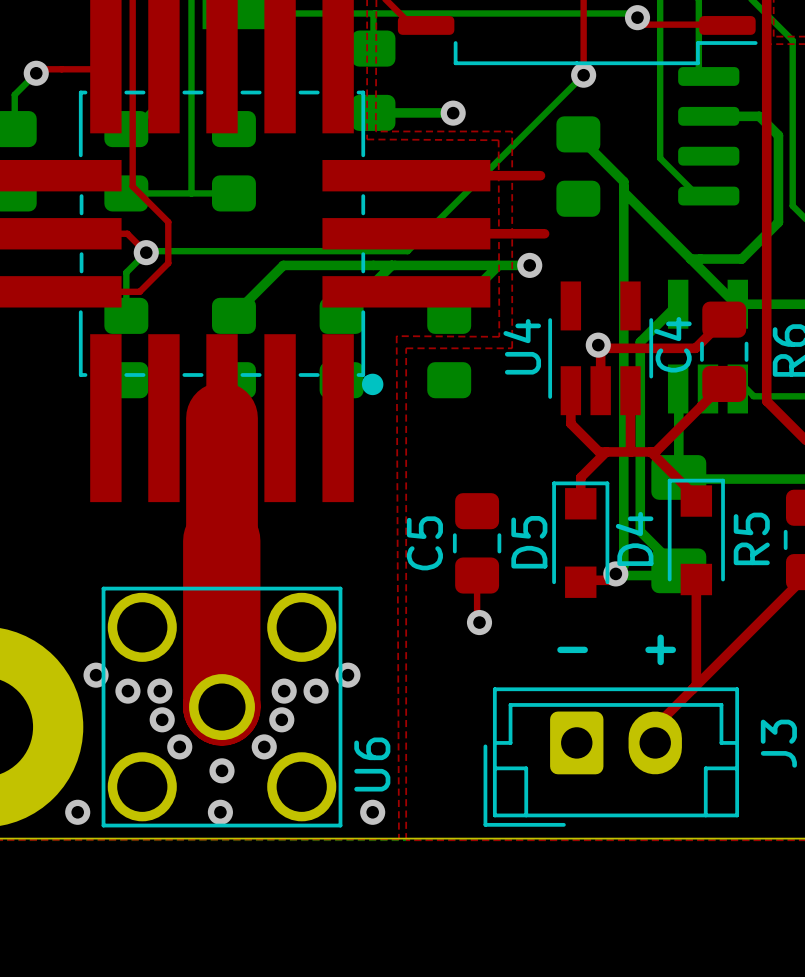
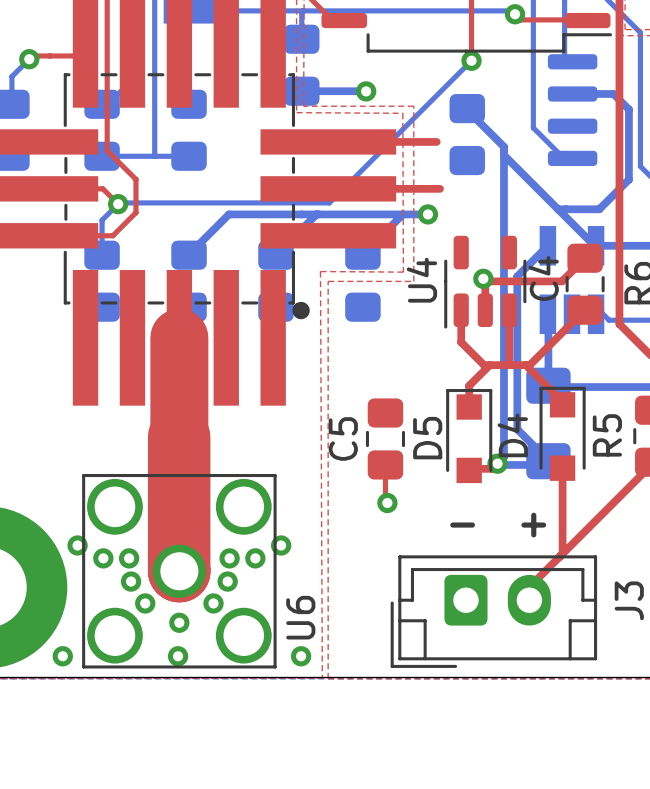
U4 footprint: [548, 281, 654, 416] -> [444, 235, 527, 329]

